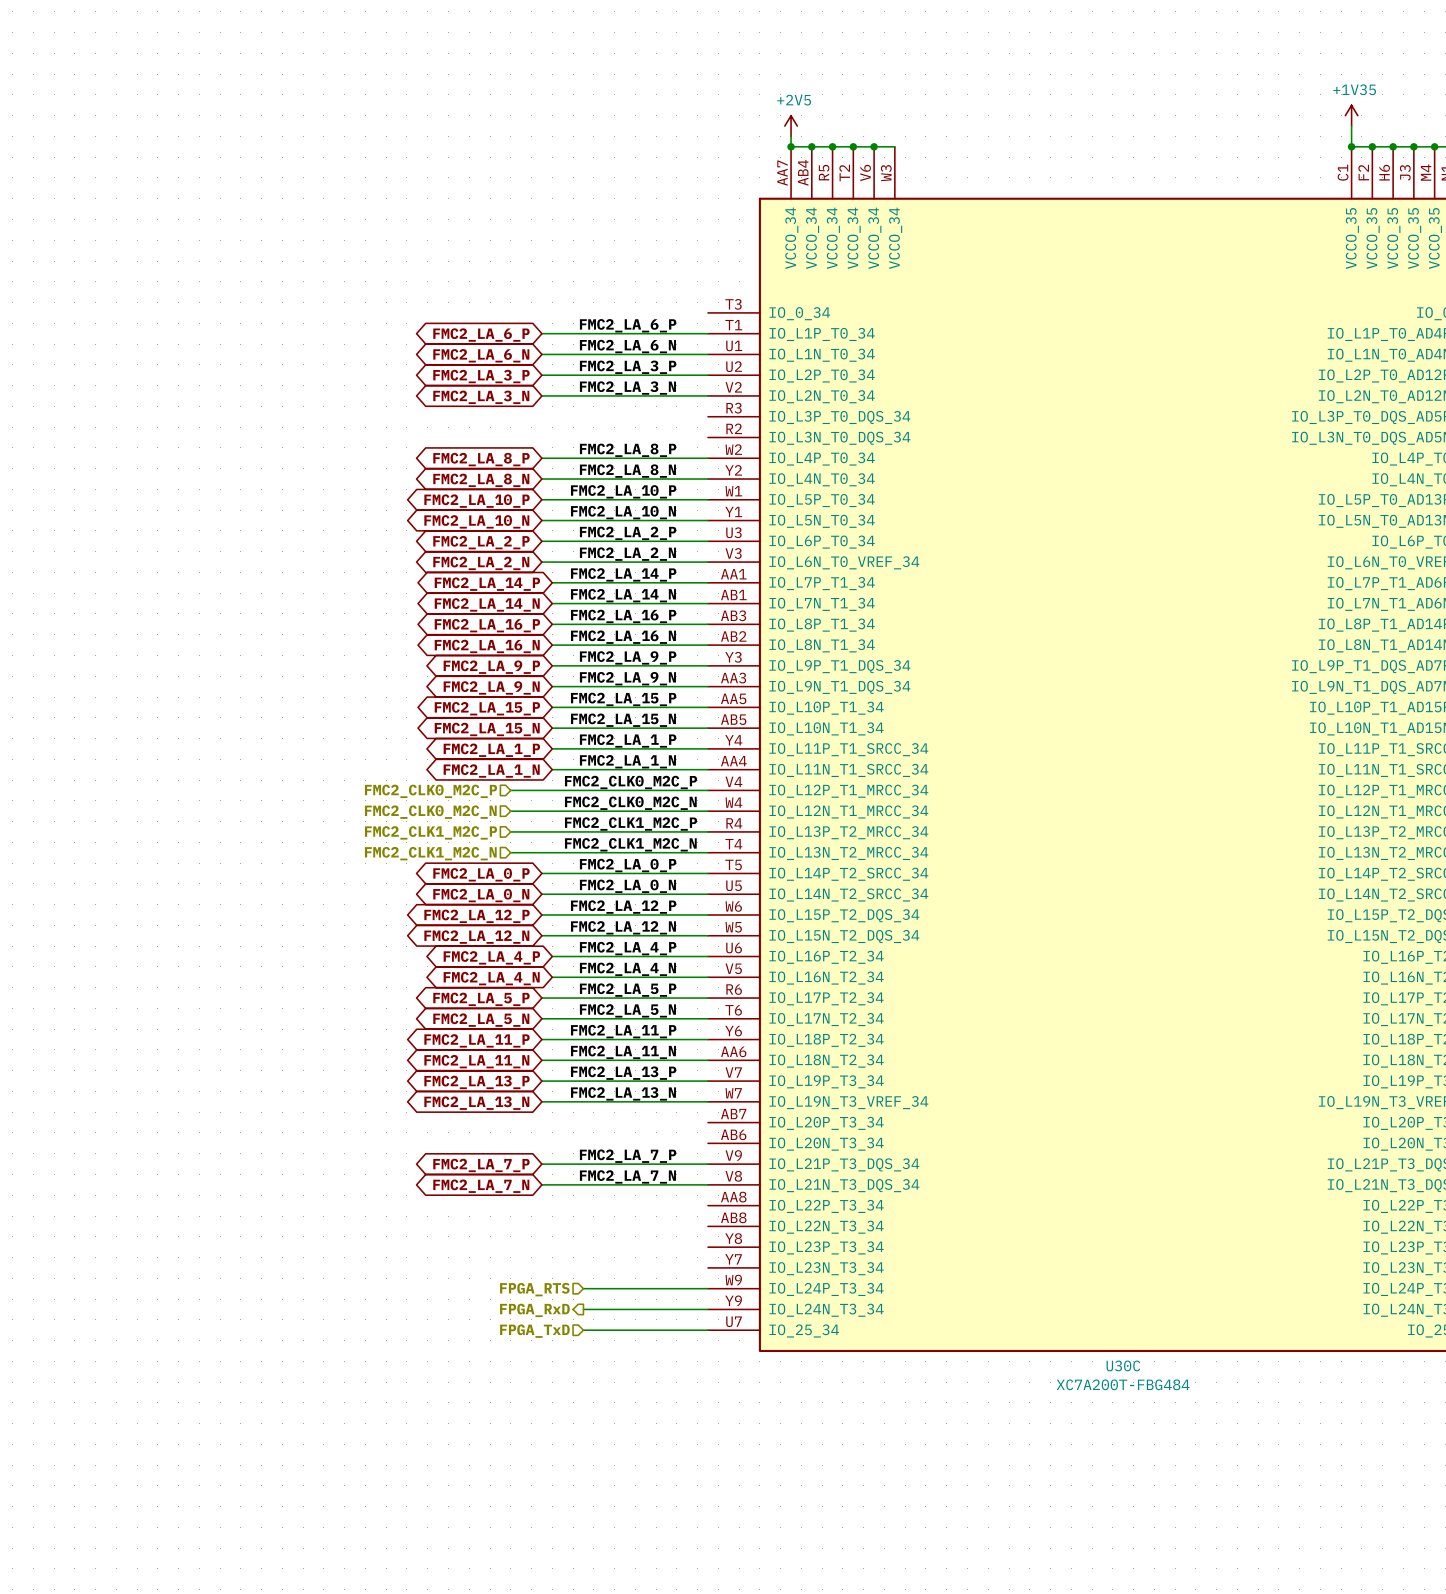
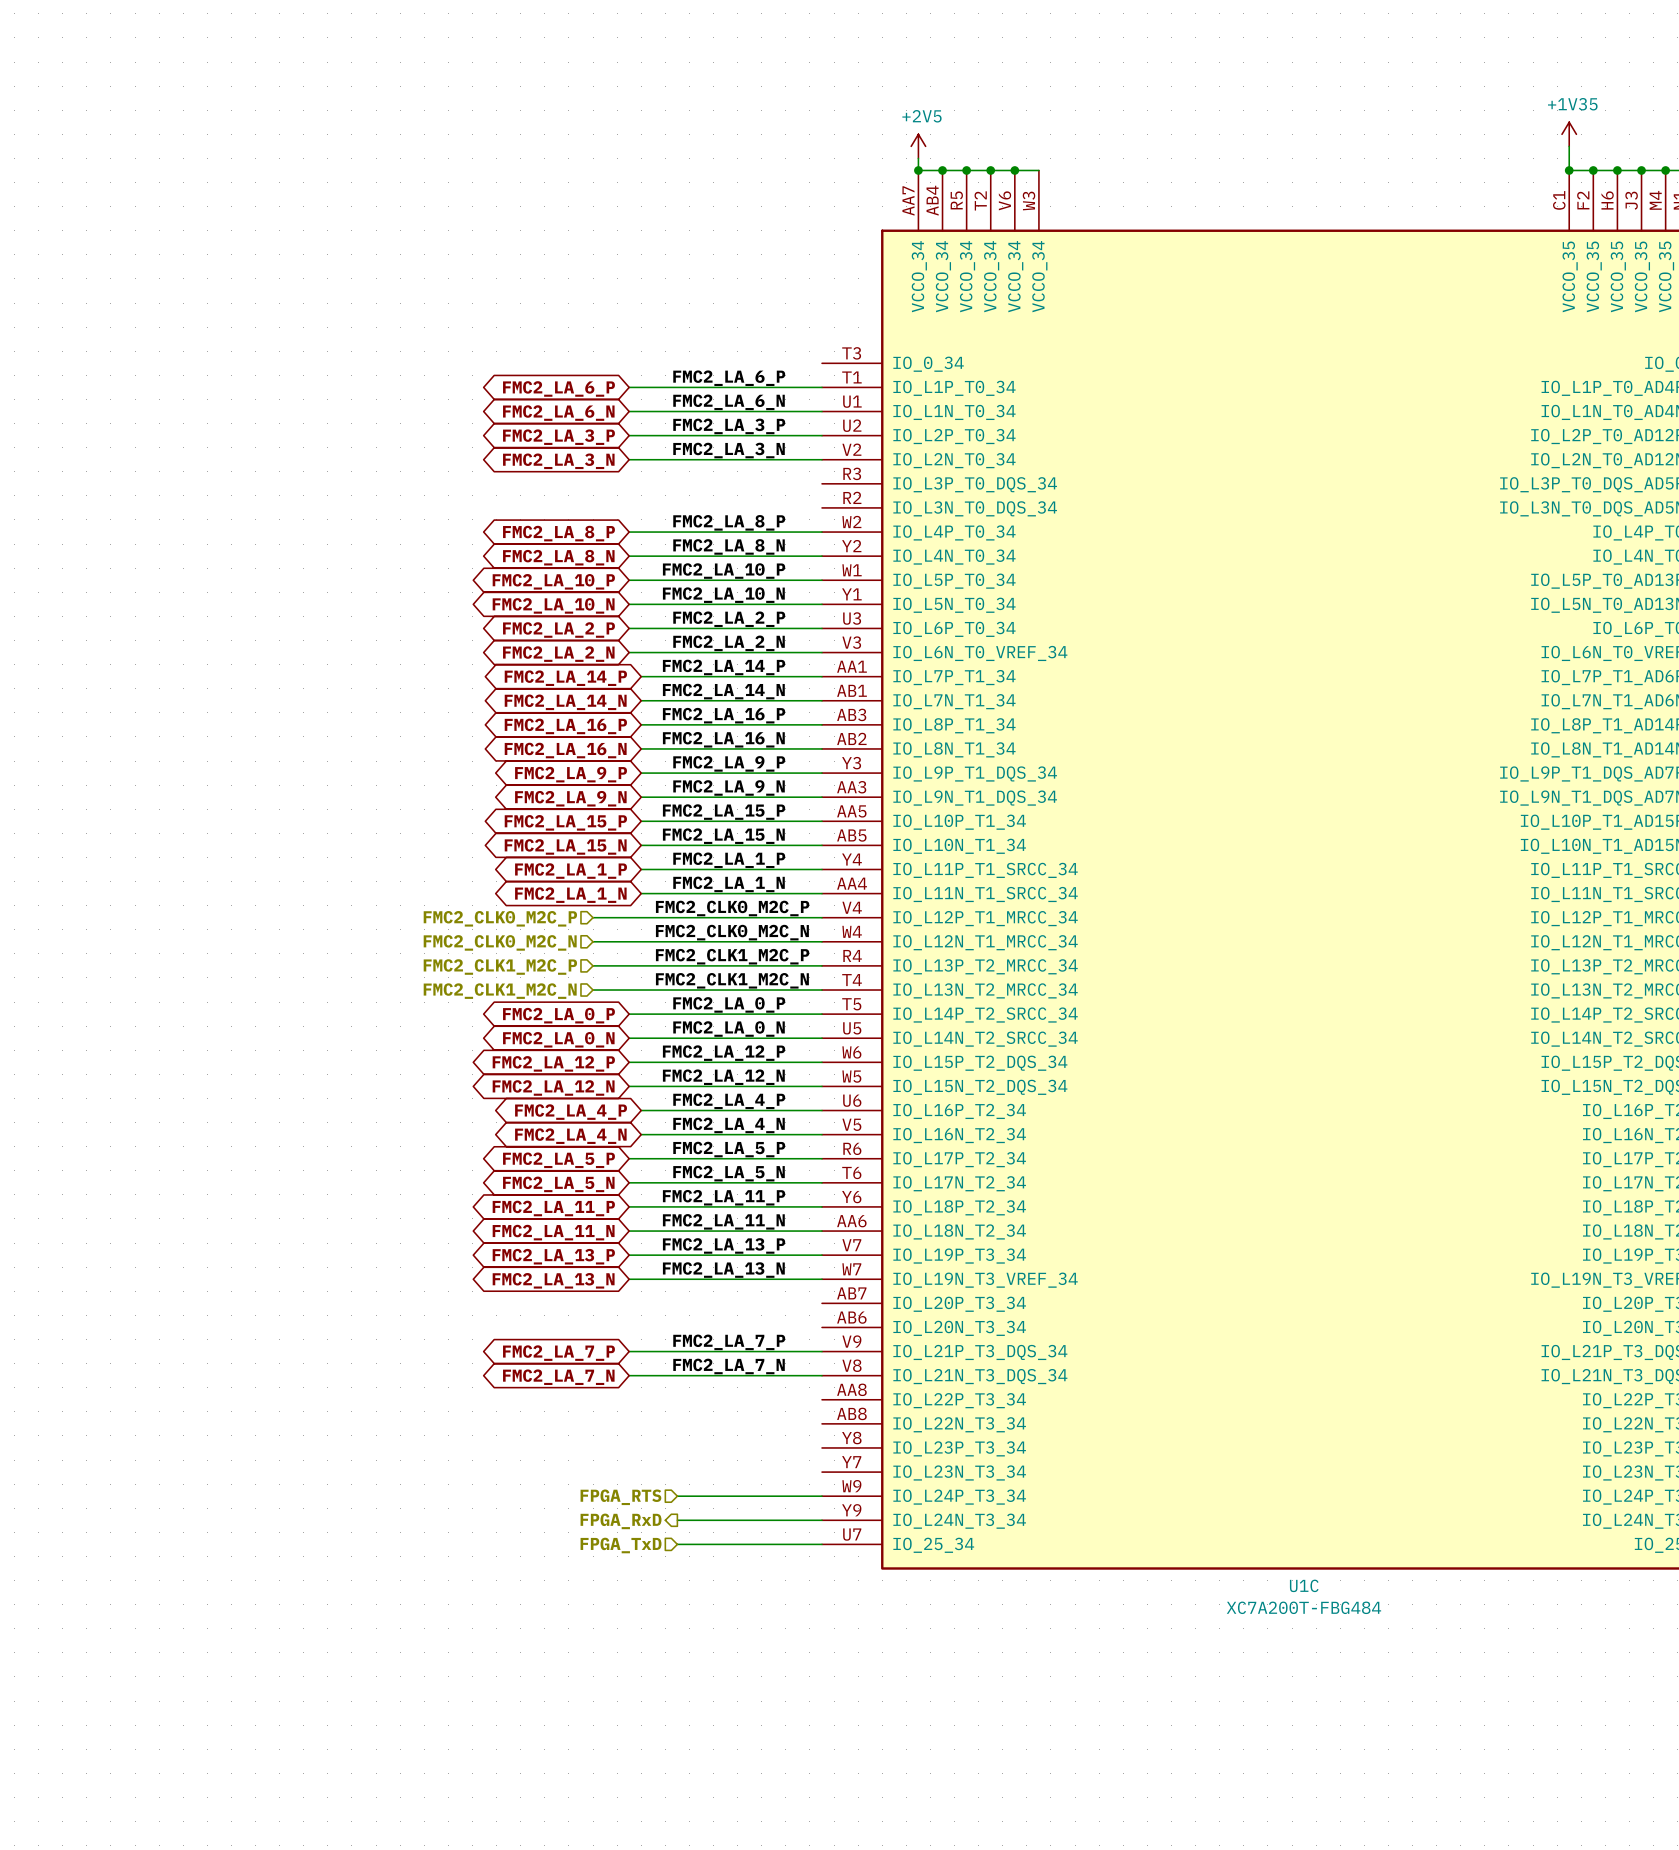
U30C name: U30C (1123, 1365) -> U1C (1304, 1585)

